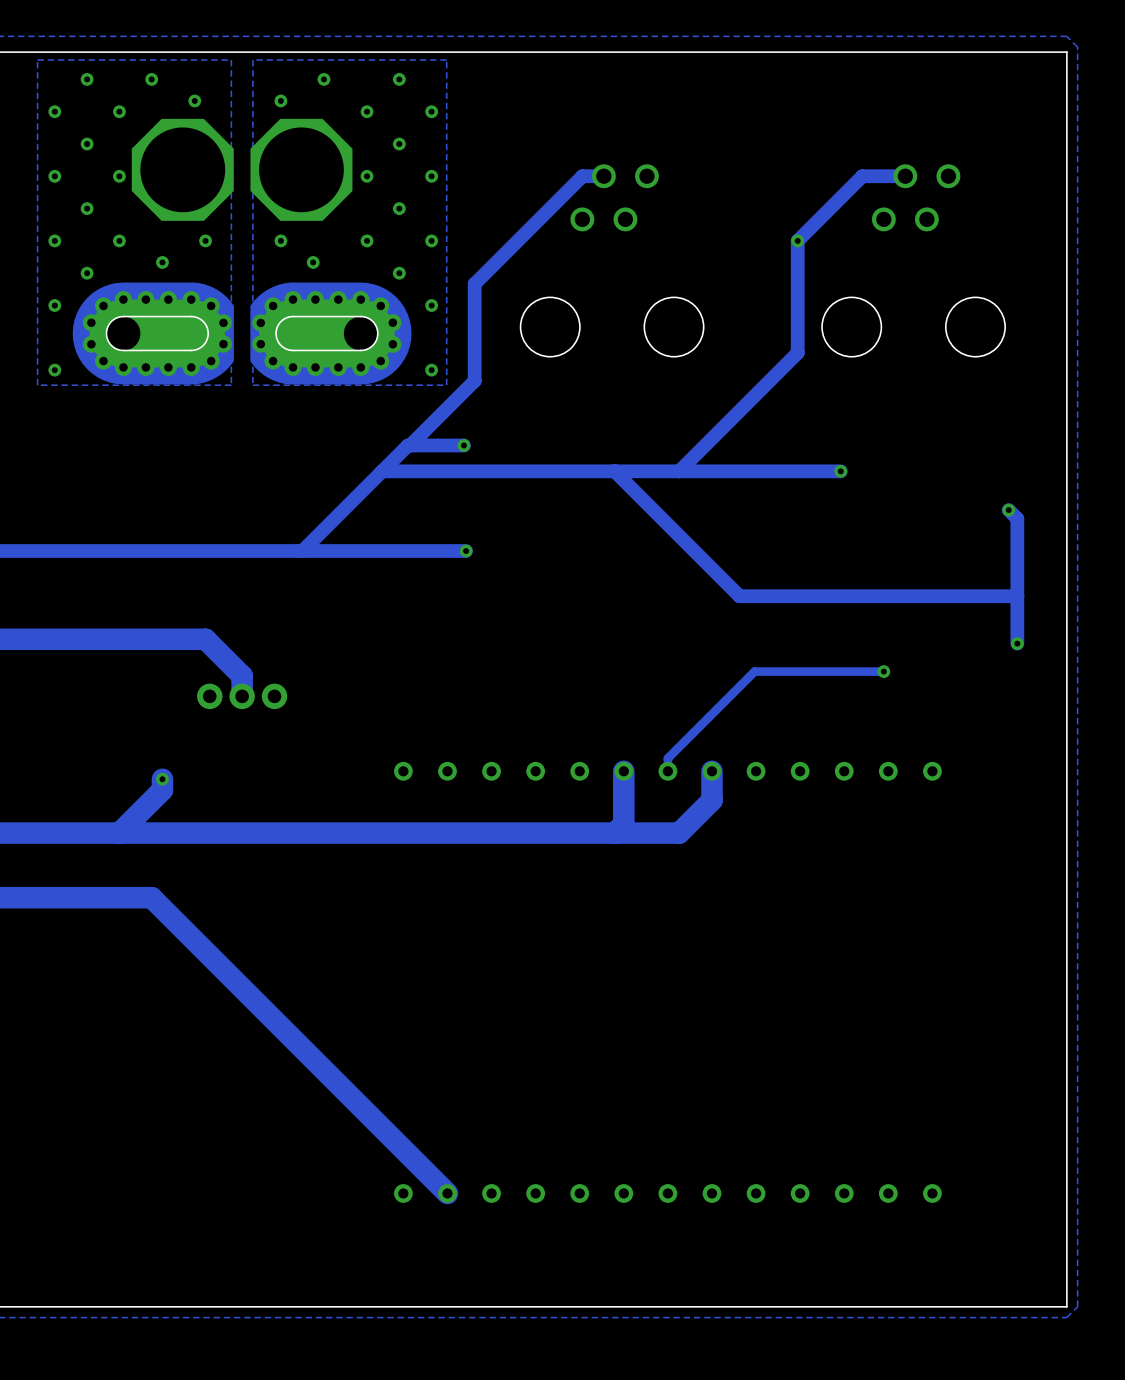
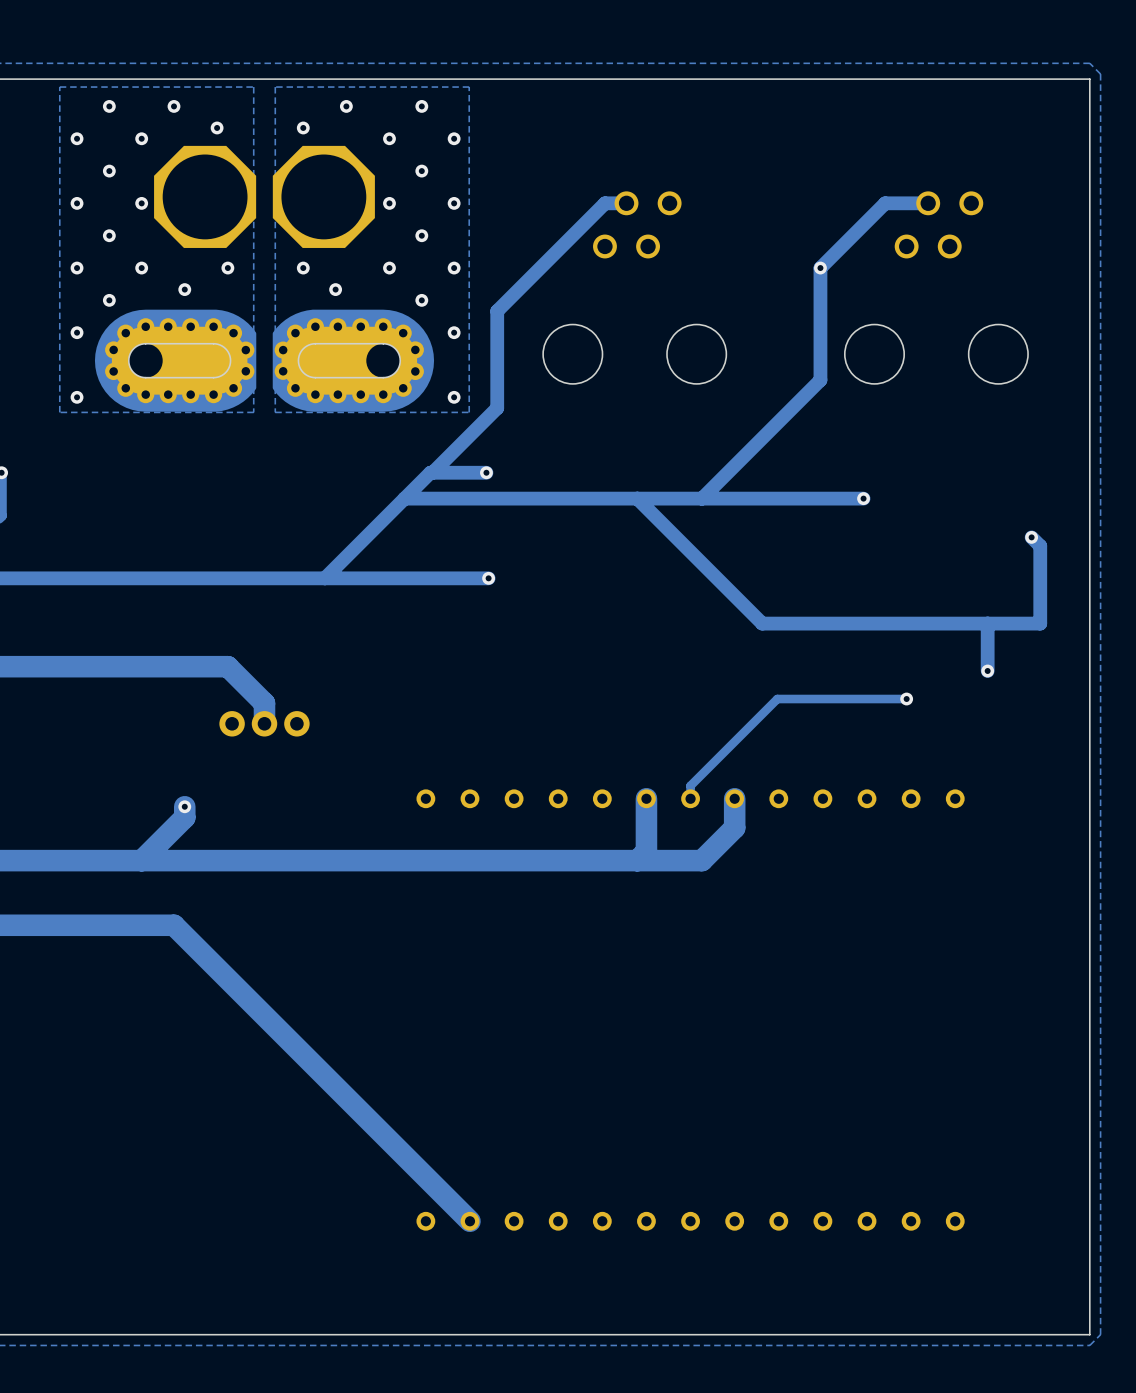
track: (1017, 596) (1017, 643) -> (987, 623) (987, 671)
via position: (1017, 643) -> (987, 671)

